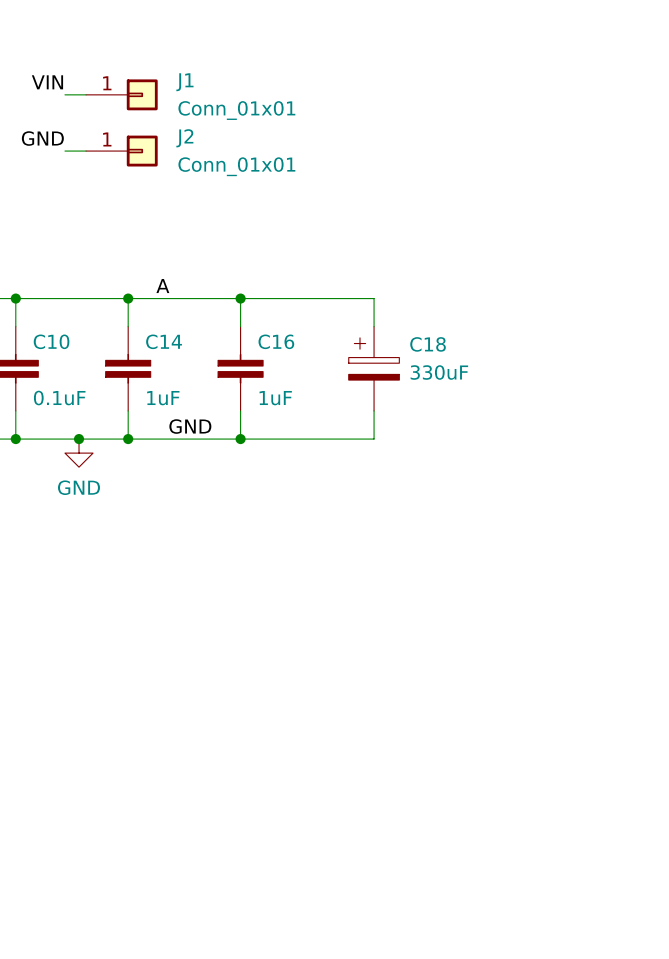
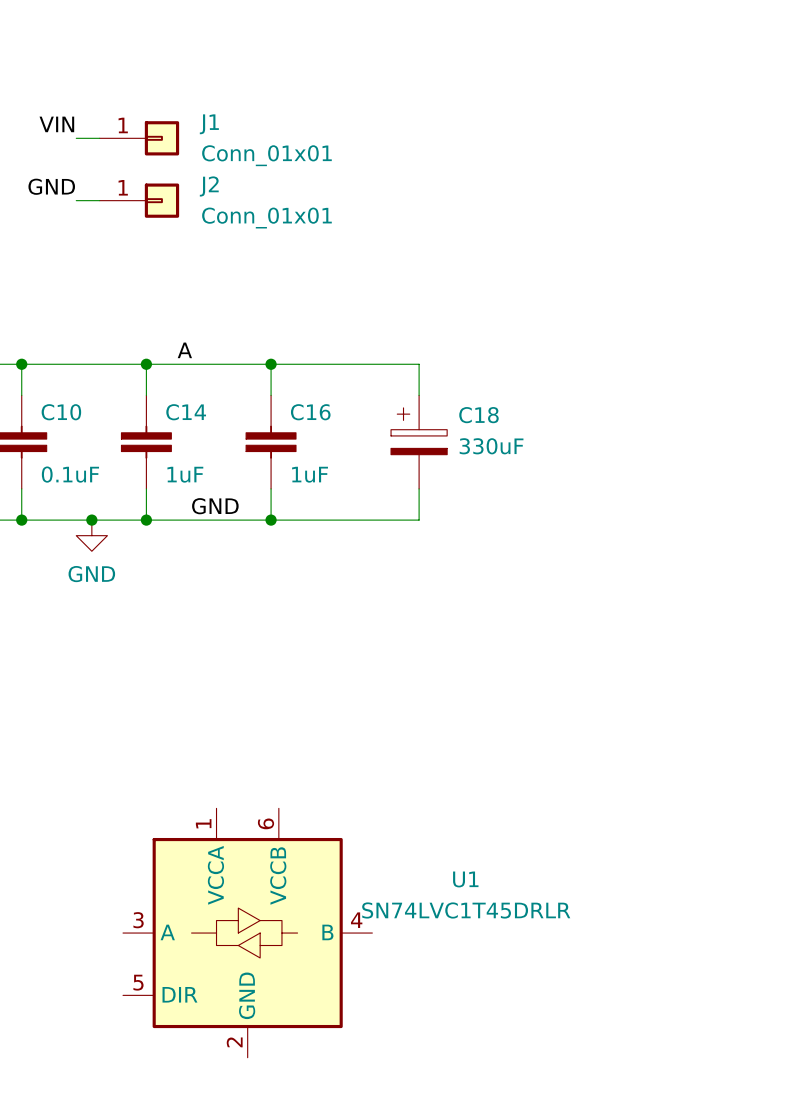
U1: none -> SN74LVC1T45DRLR (247, 933)

